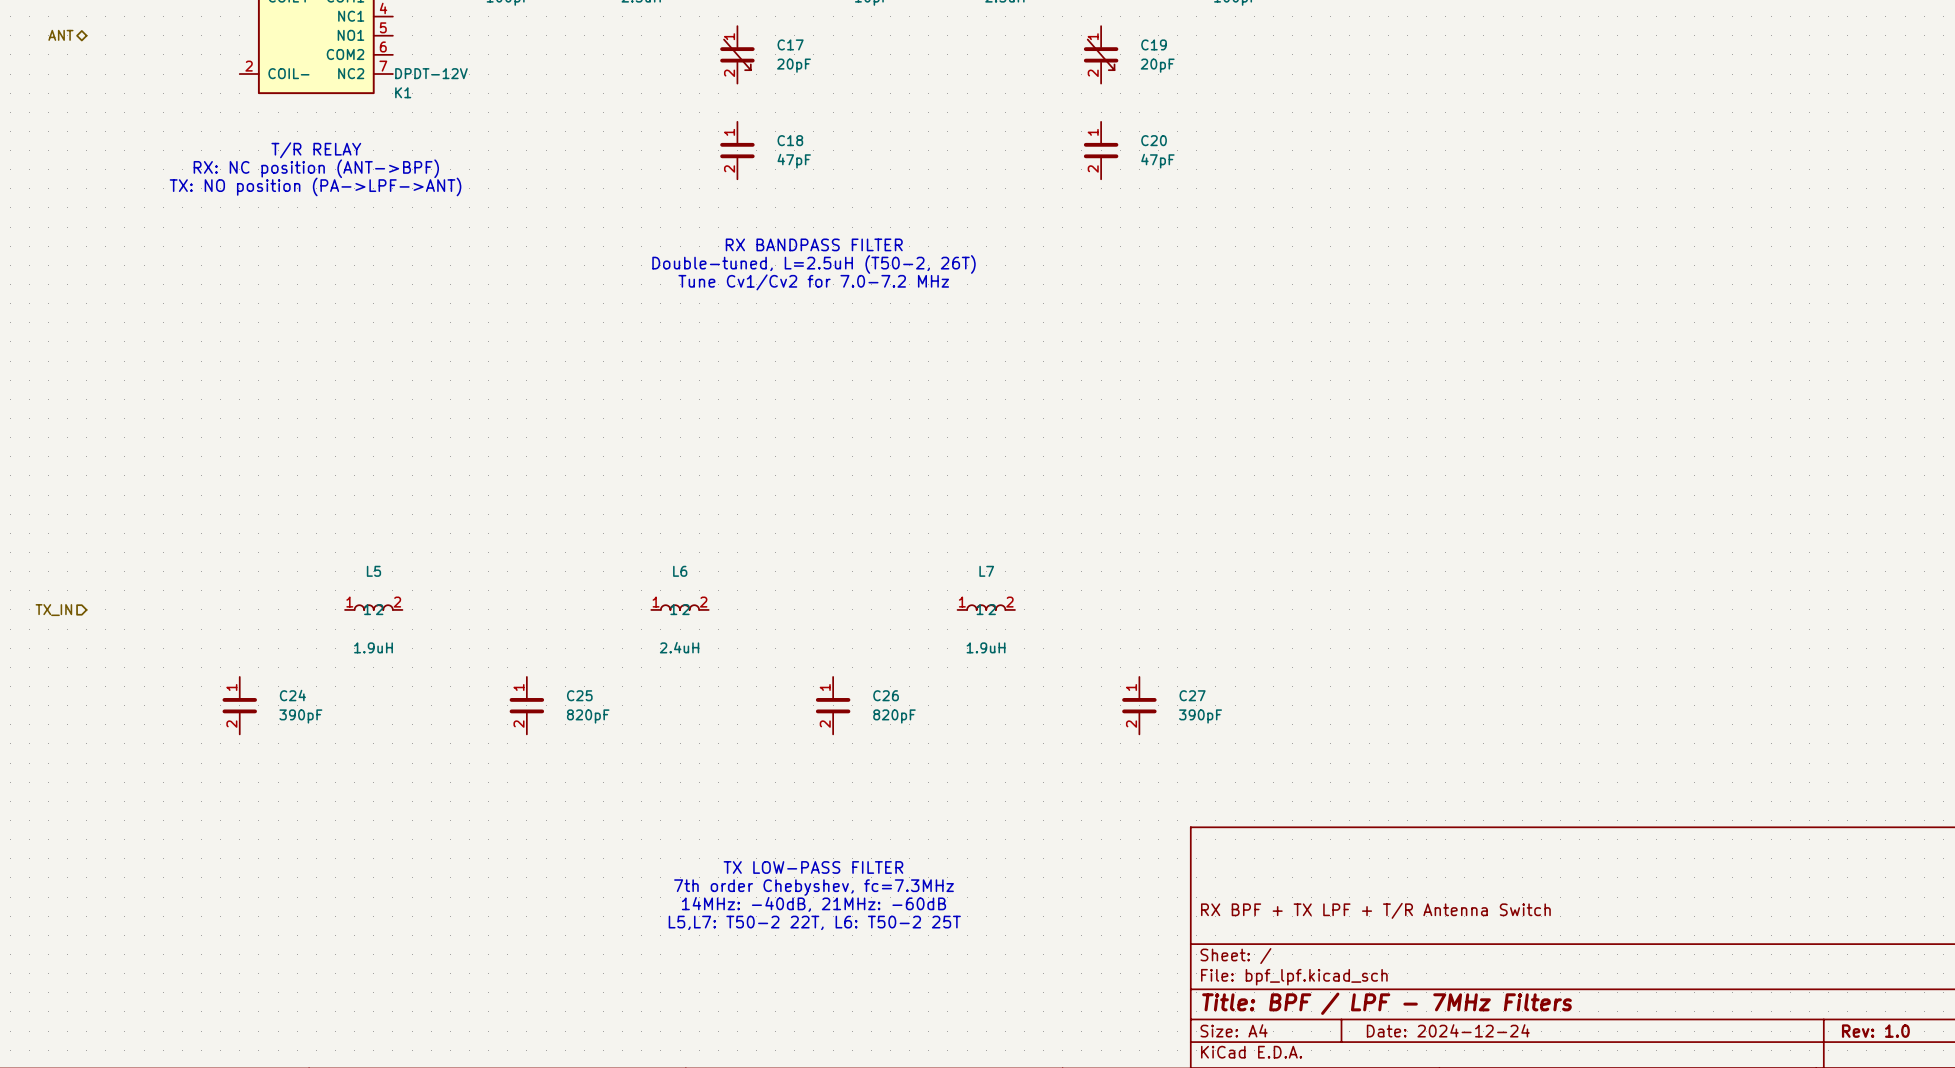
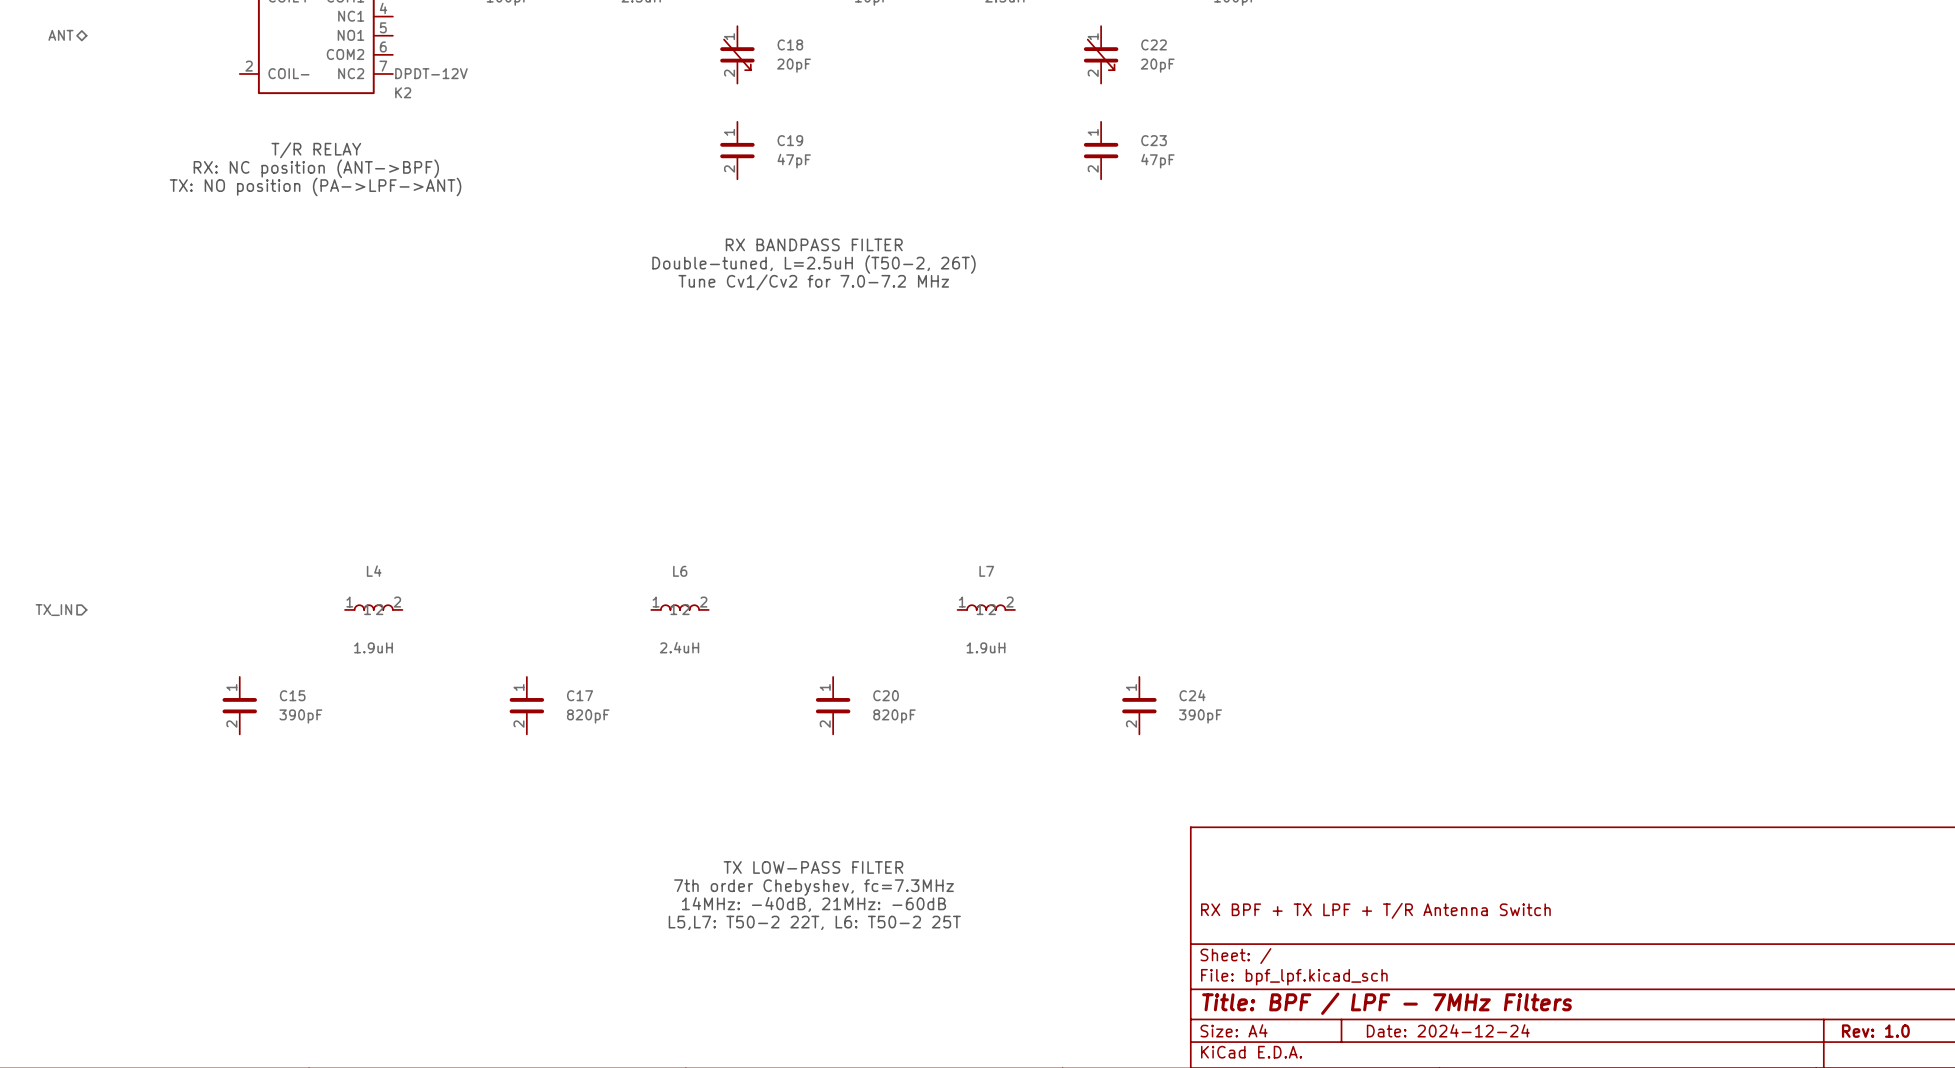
C17 name: C17 (790, 44) -> C18 (790, 44)
C19 name: C19 (1154, 44) -> C22 (1154, 44)
K1 name: K1 (403, 92) -> K2 (403, 92)
C18 name: C18 (790, 140) -> C19 (790, 140)
C20 name: C20 (1154, 140) -> C23 (1154, 140)
L5 name: L5 (373, 571) -> L4 (374, 571)
C24 name: C24 (292, 695) -> C15 (292, 695)
C25 name: C25 (579, 695) -> C17 (580, 695)
C26 name: C26 (886, 695) -> C20 (886, 695)
C27 name: C27 (1192, 695) -> C24 (1192, 695)

